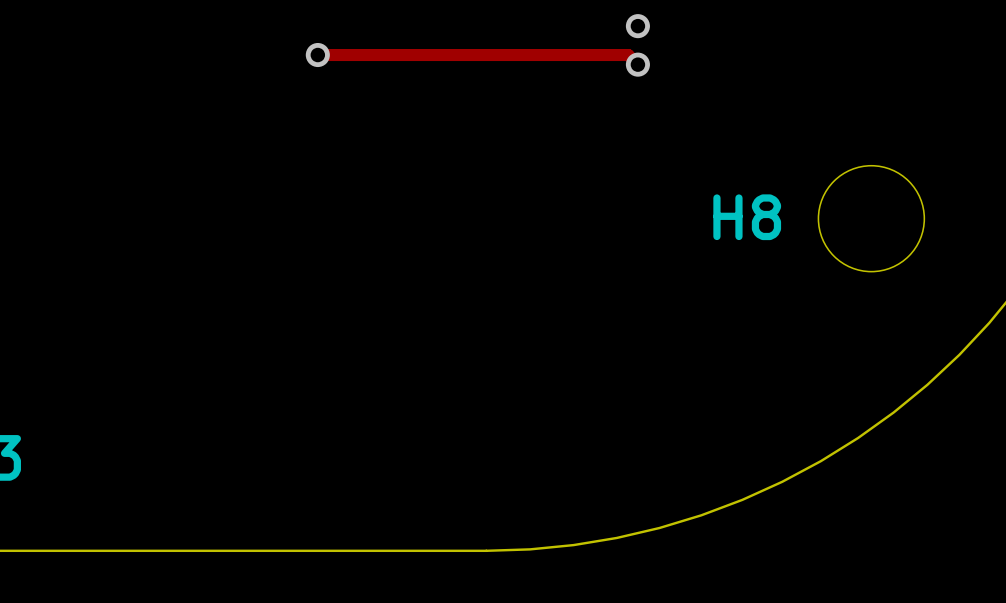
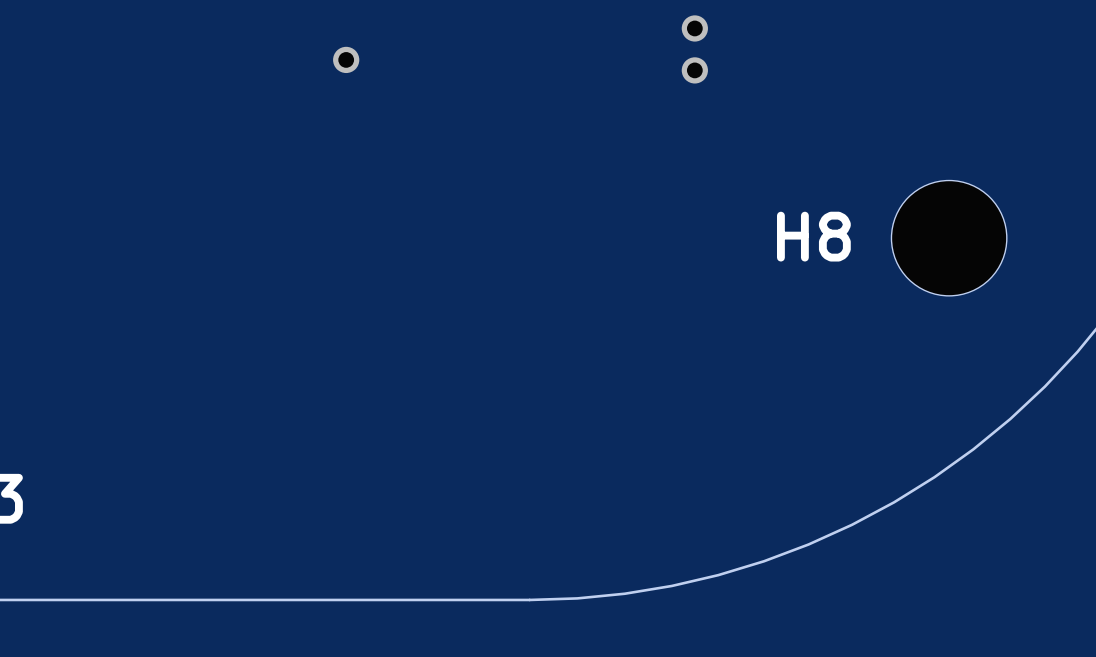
track: (317, 55) (628, 55) (637, 64) -> none

